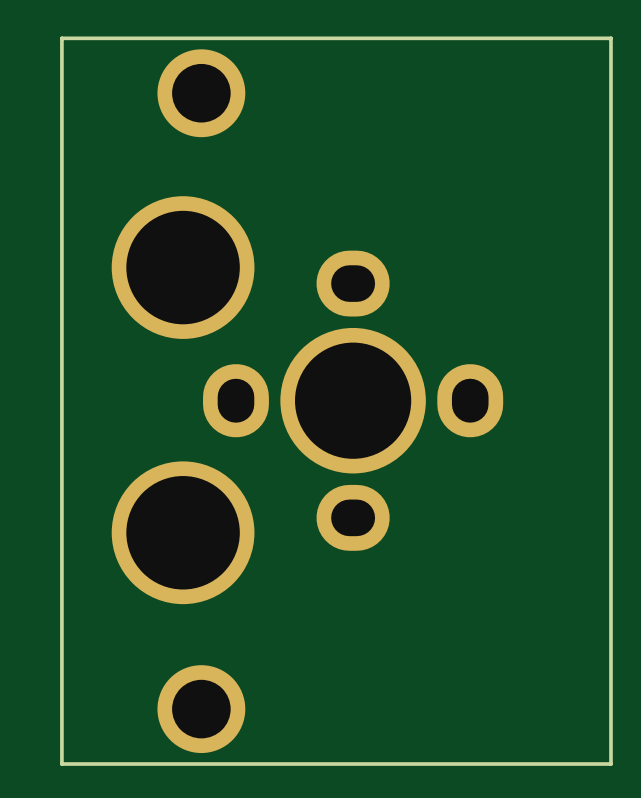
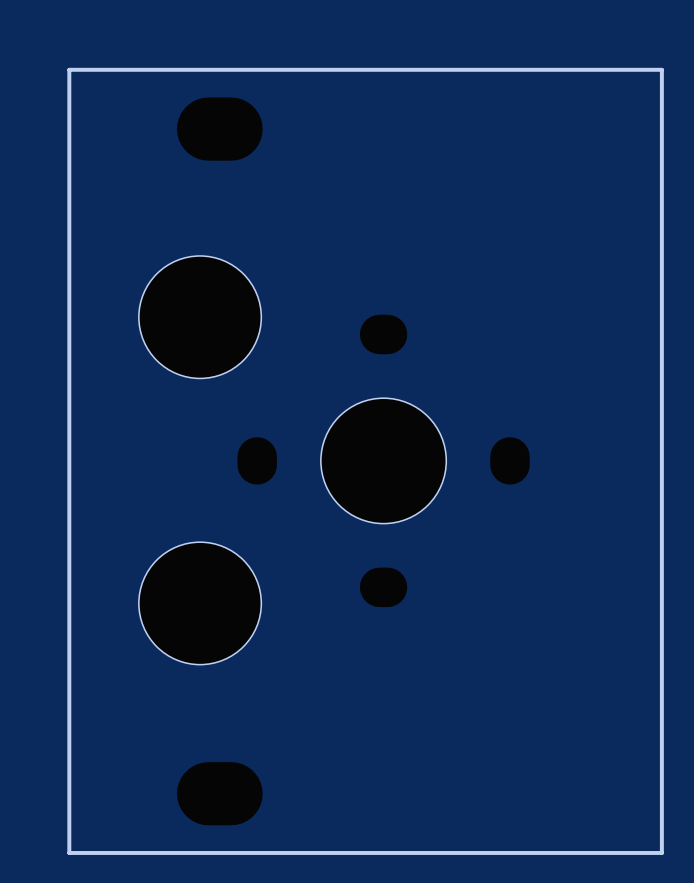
part footprint: [157, 49, 246, 138] -> [176, 97, 263, 161]
part footprint: [111, 196, 255, 339] -> [138, 255, 262, 379]
part footprint: [203, 250, 504, 551] -> [237, 314, 530, 608]
part footprint: [111, 461, 255, 605] -> [138, 542, 262, 665]
part footprint: [157, 665, 246, 754] -> [176, 762, 263, 826]

